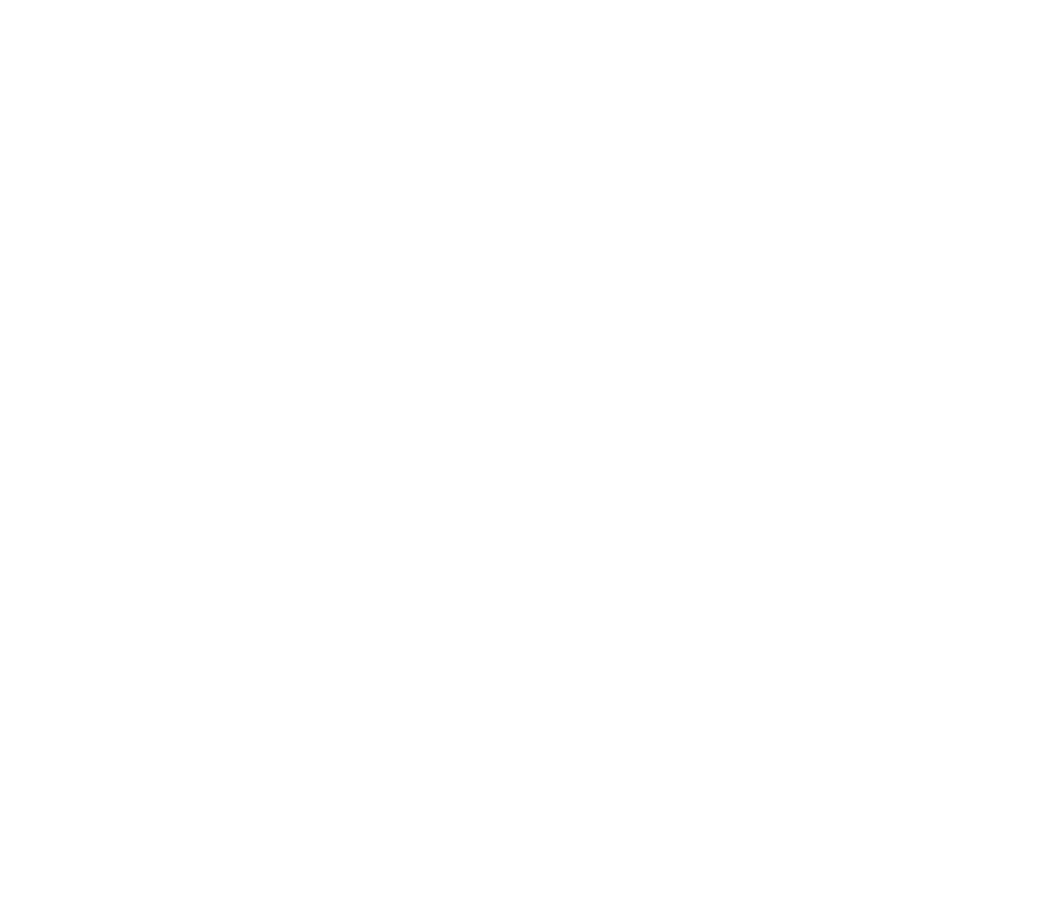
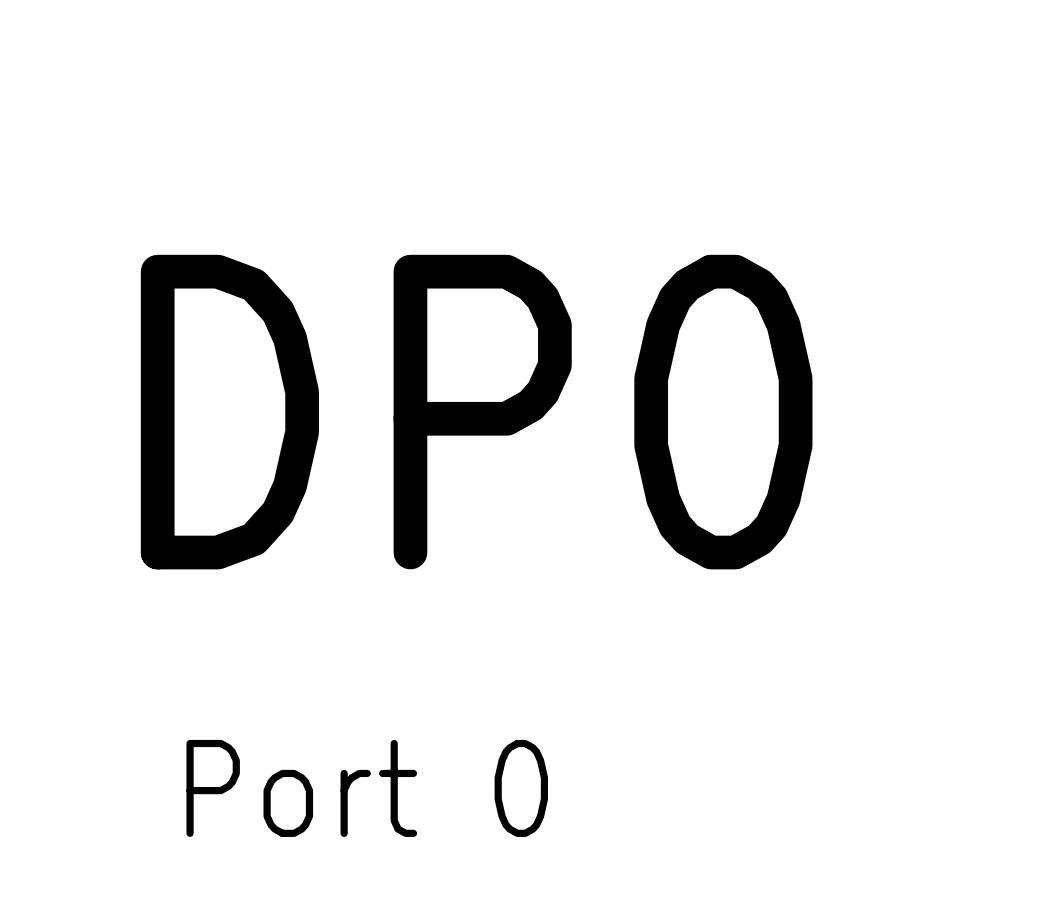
text: none -> DP0 (476, 412)
text: none -> Port 0 (367, 788)

